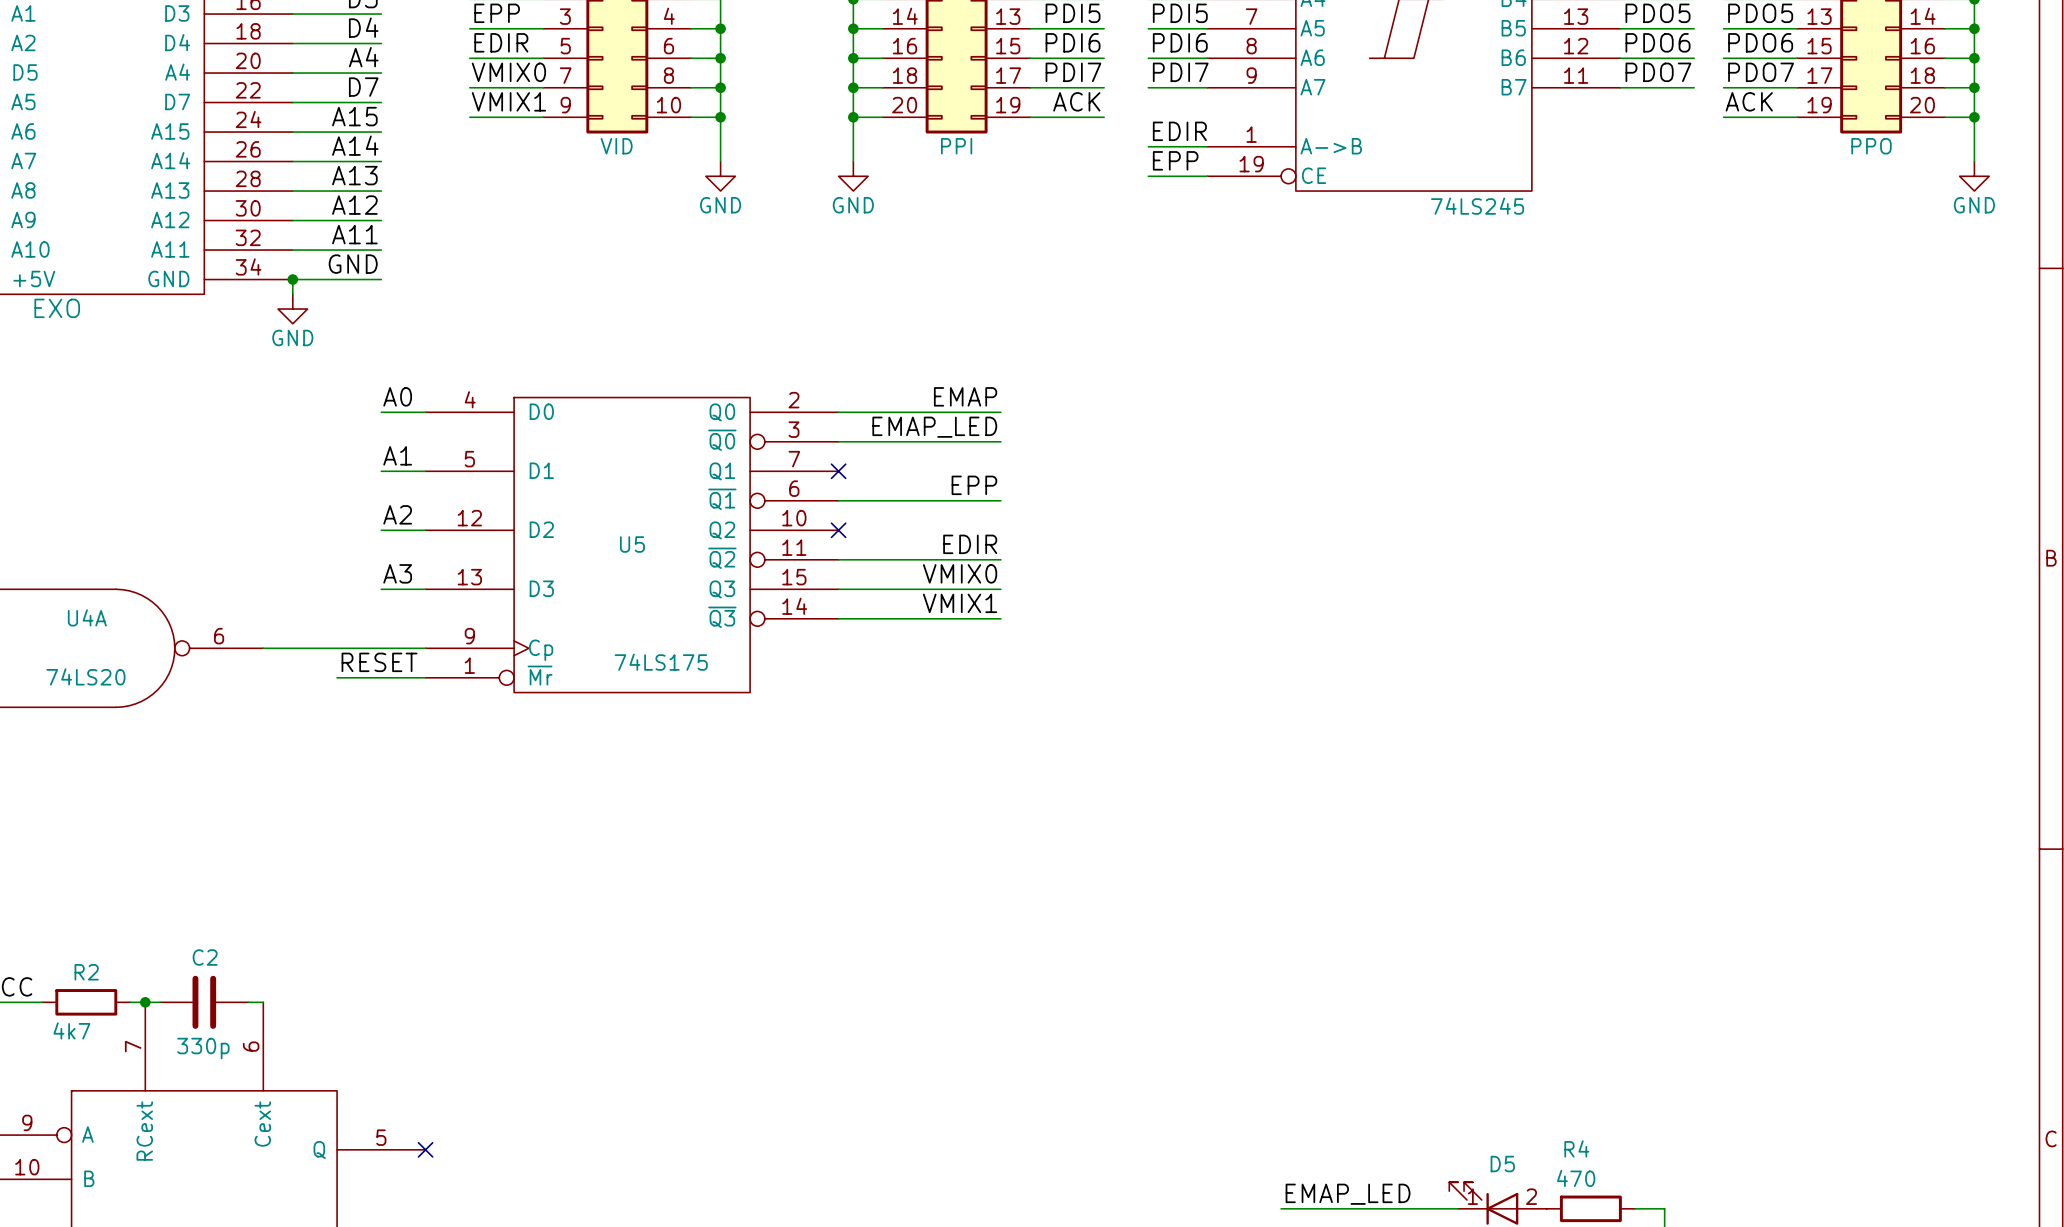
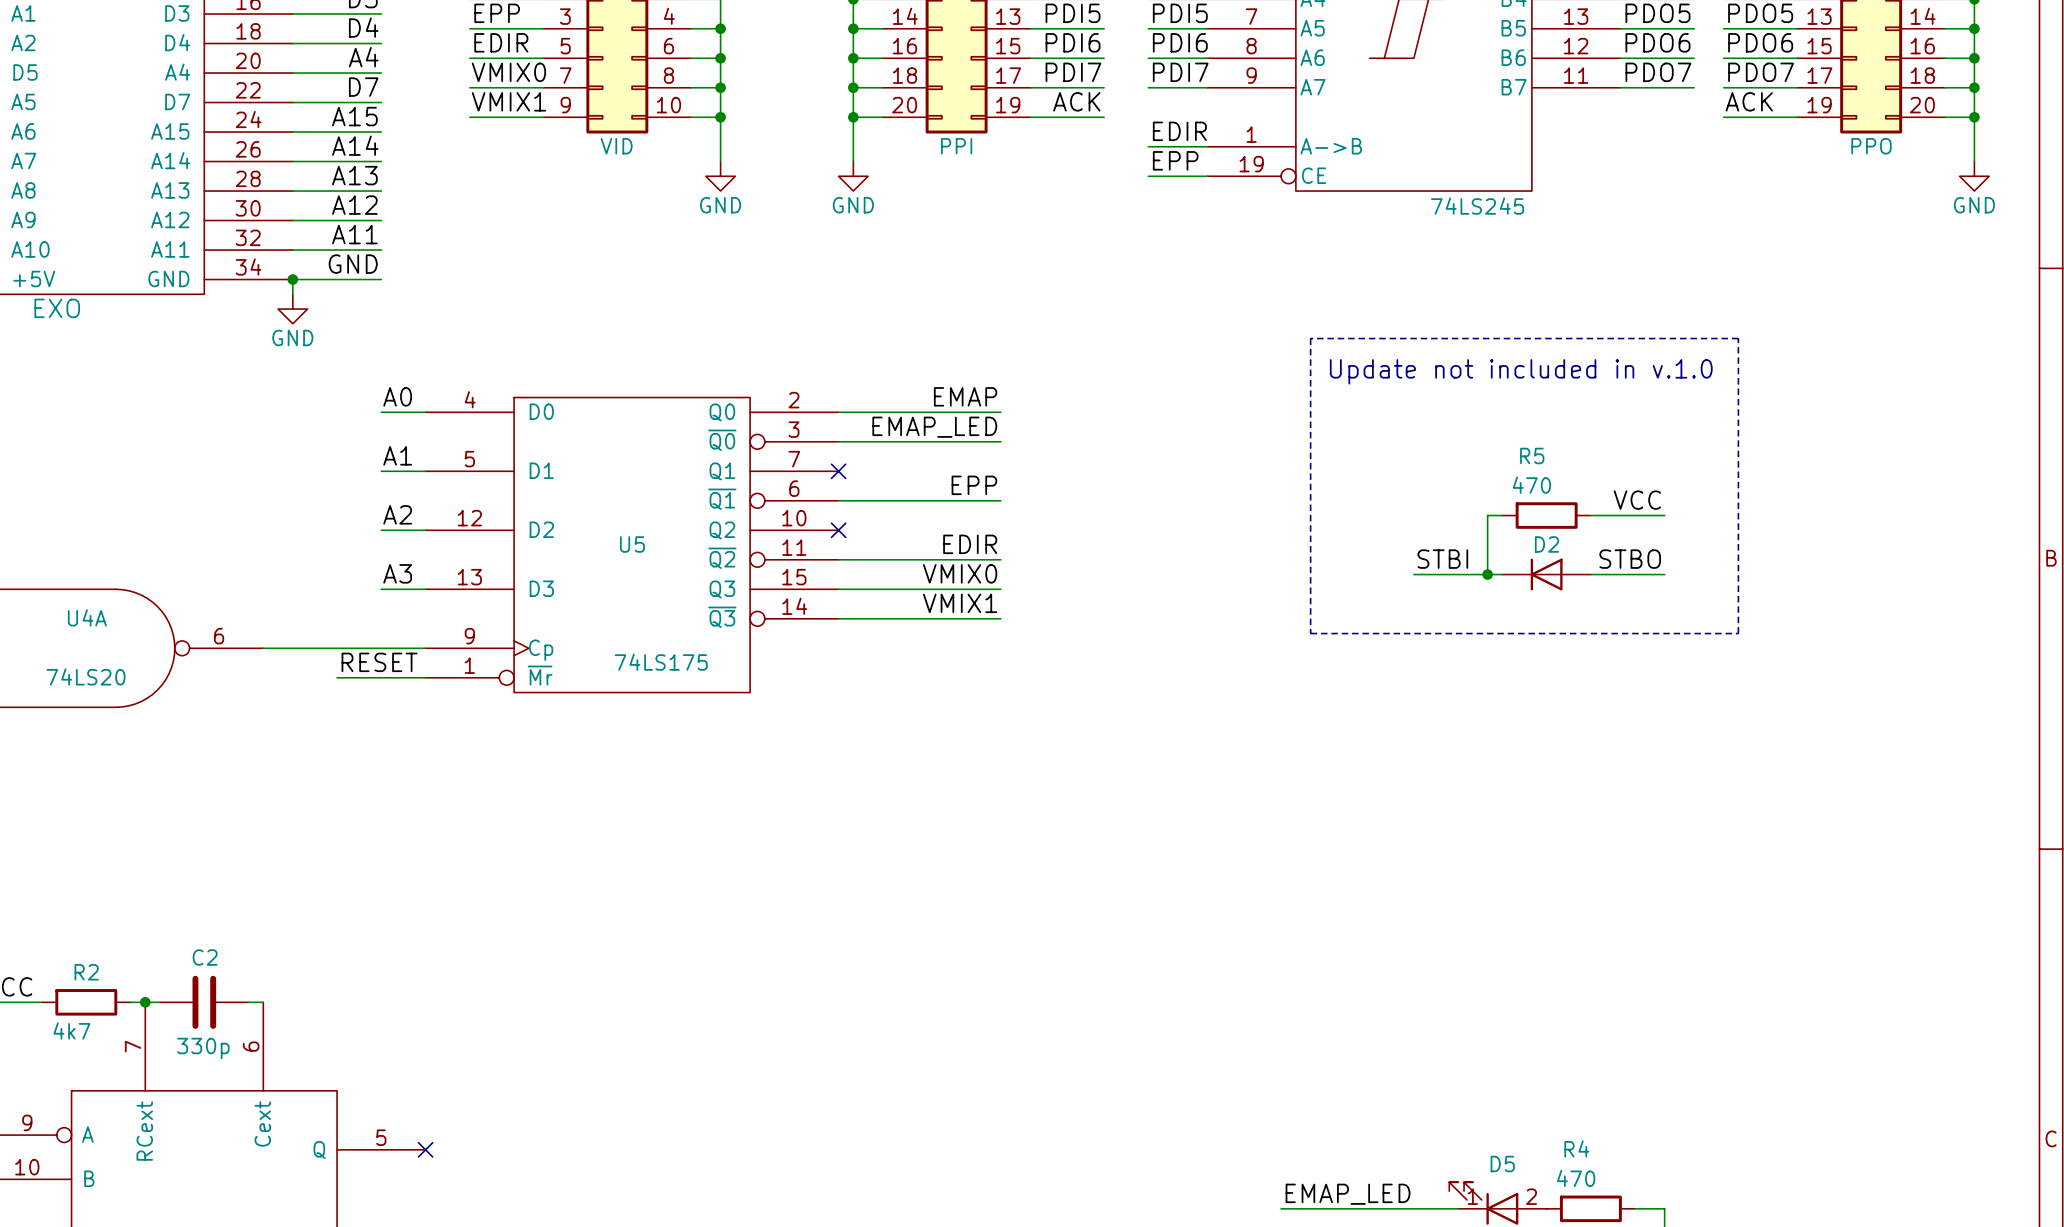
line: none -> (1310, 338) (1310, 633) (1738, 633) (1738, 338) (1310, 338)
text: none -> Update not included in v.1.0 (1521, 371)
label: none -> VCC (1637, 500)
wire: none -> (1502, 515) (1487, 515) (1487, 574)
R5: none -> 470 (1546, 515)
wire: none -> (1590, 515) (1664, 515)
label: none -> STBI (1442, 559)
label: none -> STBO (1630, 559)
wire: none -> (1413, 574) (1502, 574)
junction: none -> (1487, 574)
D2: none -> (1546, 574)
wire: none -> (1590, 574) (1664, 574)

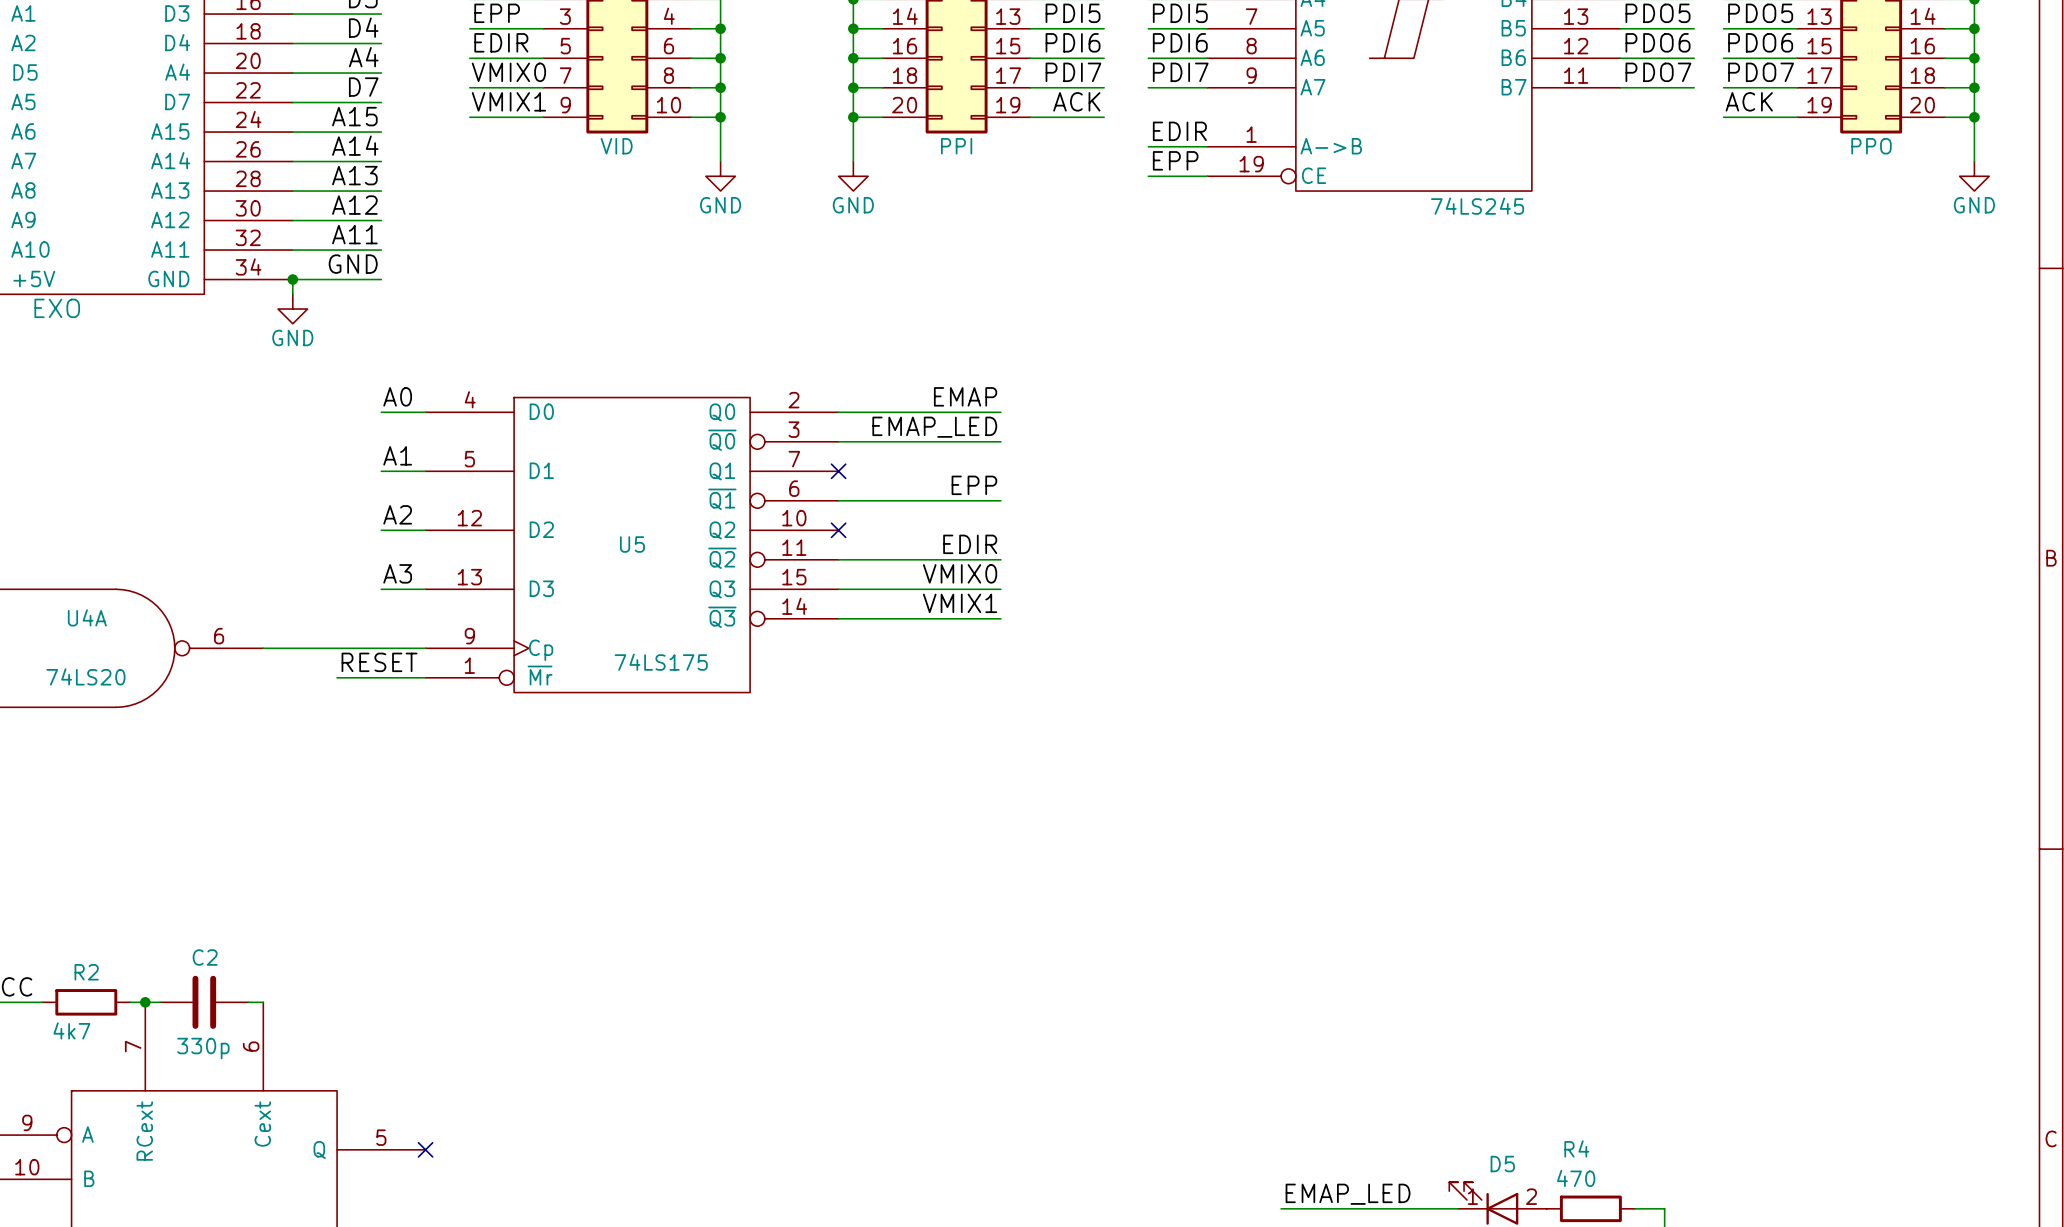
line: (1310, 338) (1310, 633) (1738, 633) (1738, 338) (1310, 338) -> none
text: Update not included in v.1.0 (1521, 371) -> none
label: VCC (1637, 500) -> none
wire: (1502, 515) (1487, 515) (1487, 574) -> none
R5: 470 (1546, 515) -> none
wire: (1590, 515) (1664, 515) -> none
label: STBI (1442, 559) -> none
label: STBO (1630, 559) -> none
wire: (1413, 574) (1502, 574) -> none
junction: (1487, 574) -> none
D2: (1546, 574) -> none
wire: (1590, 574) (1664, 574) -> none

